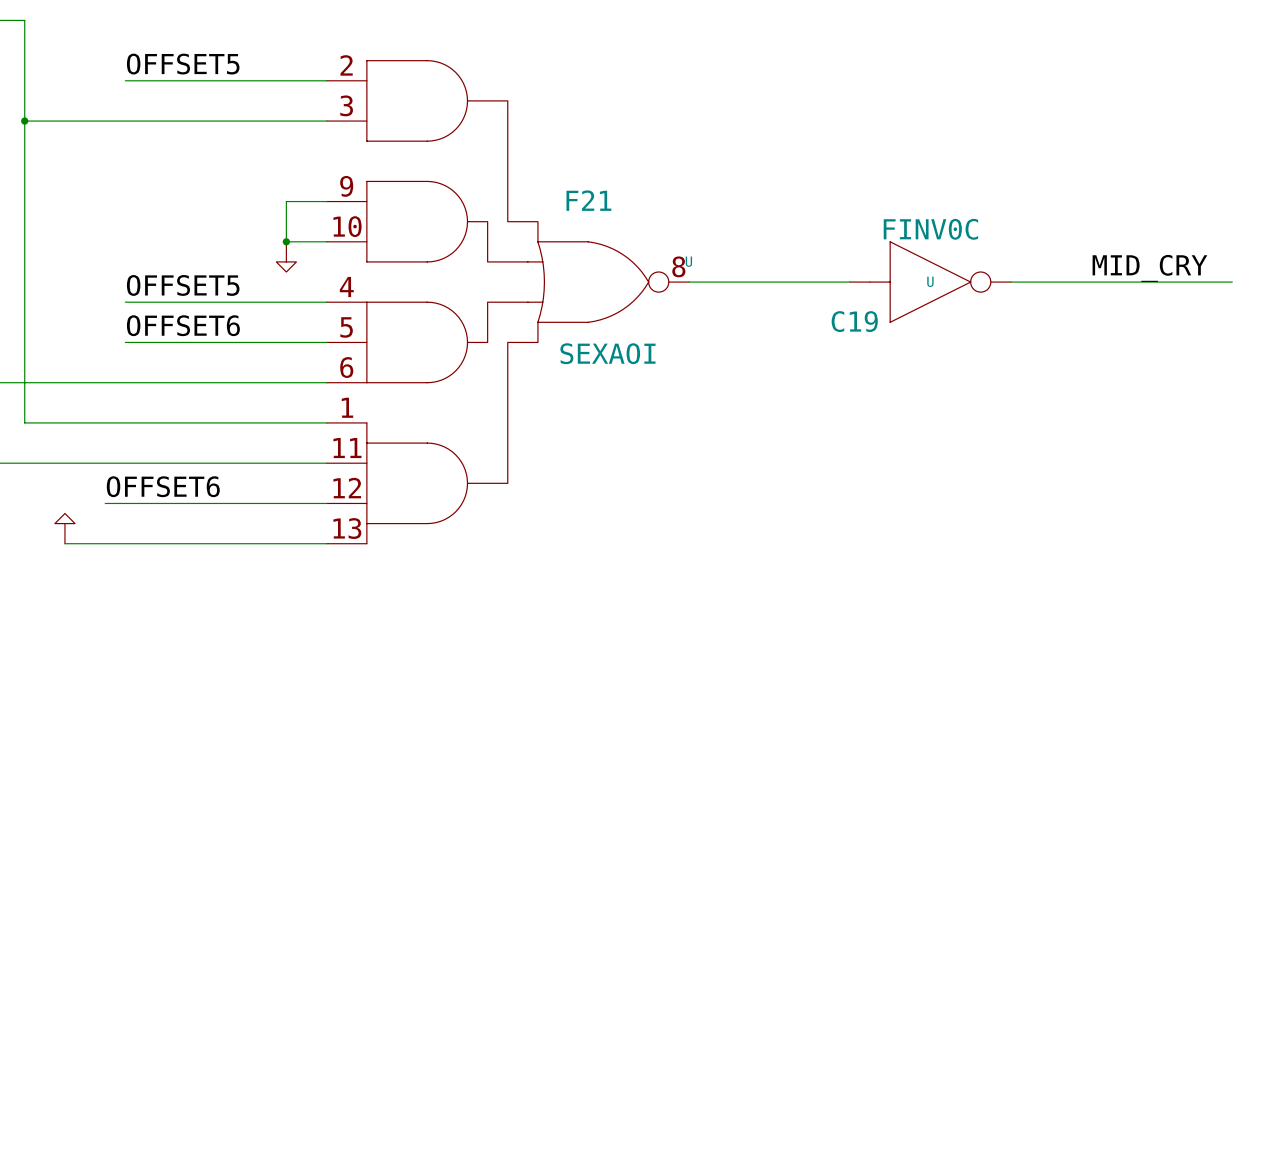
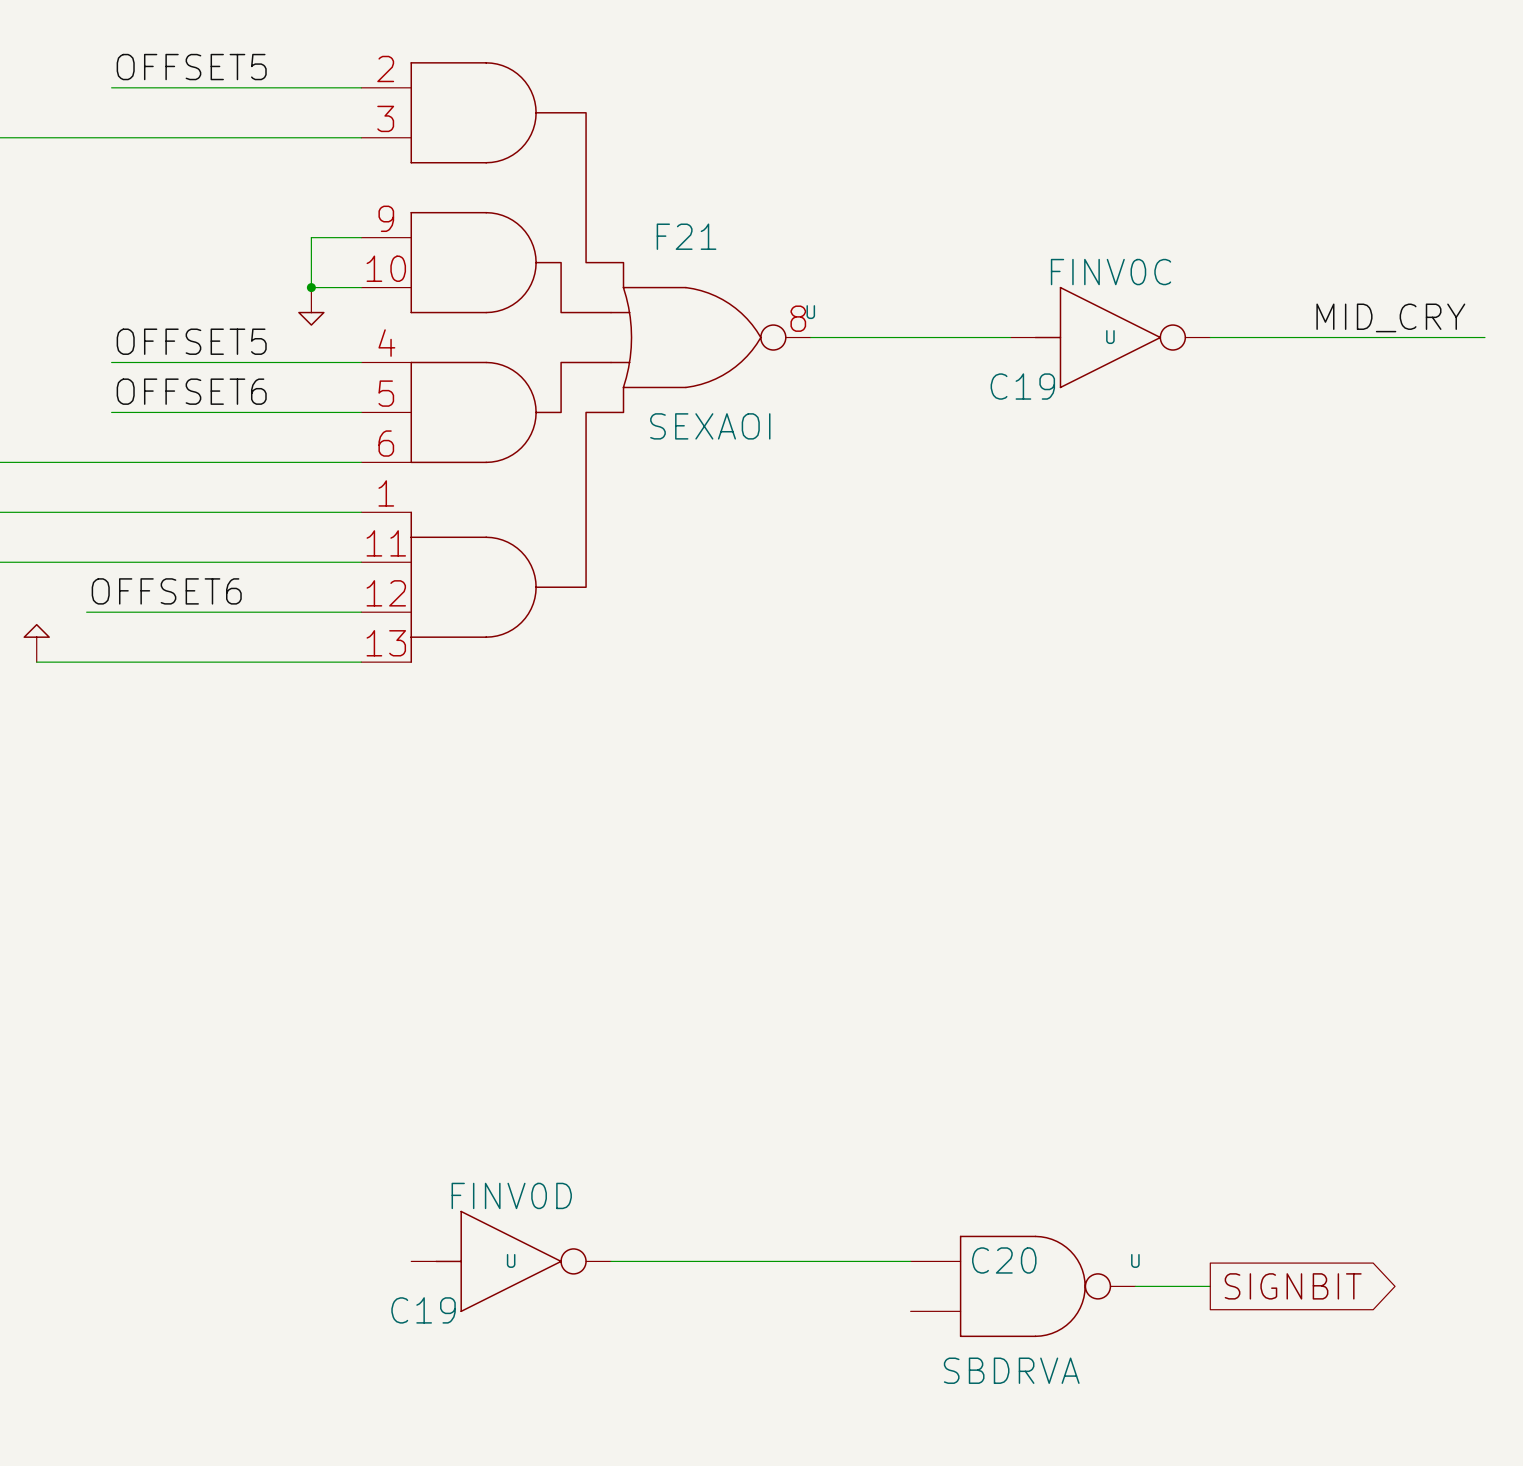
U: none -> (511, 1261)
wire: none -> (611, 1261) (910, 1261)
U: none -> (1023, 1286)
wire: none -> (1135, 1286) (1210, 1286)
global label: none -> SIGNBIT (1293, 1286)

